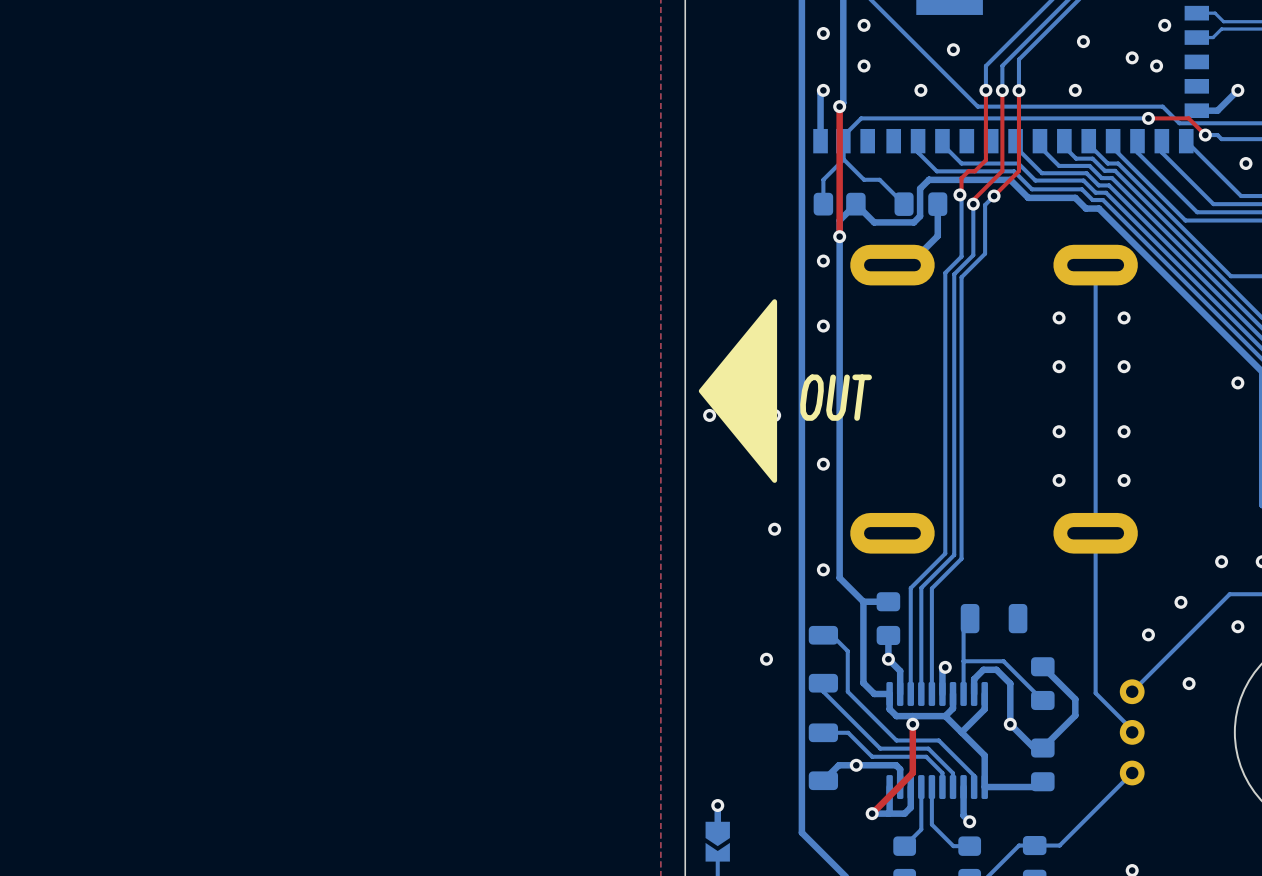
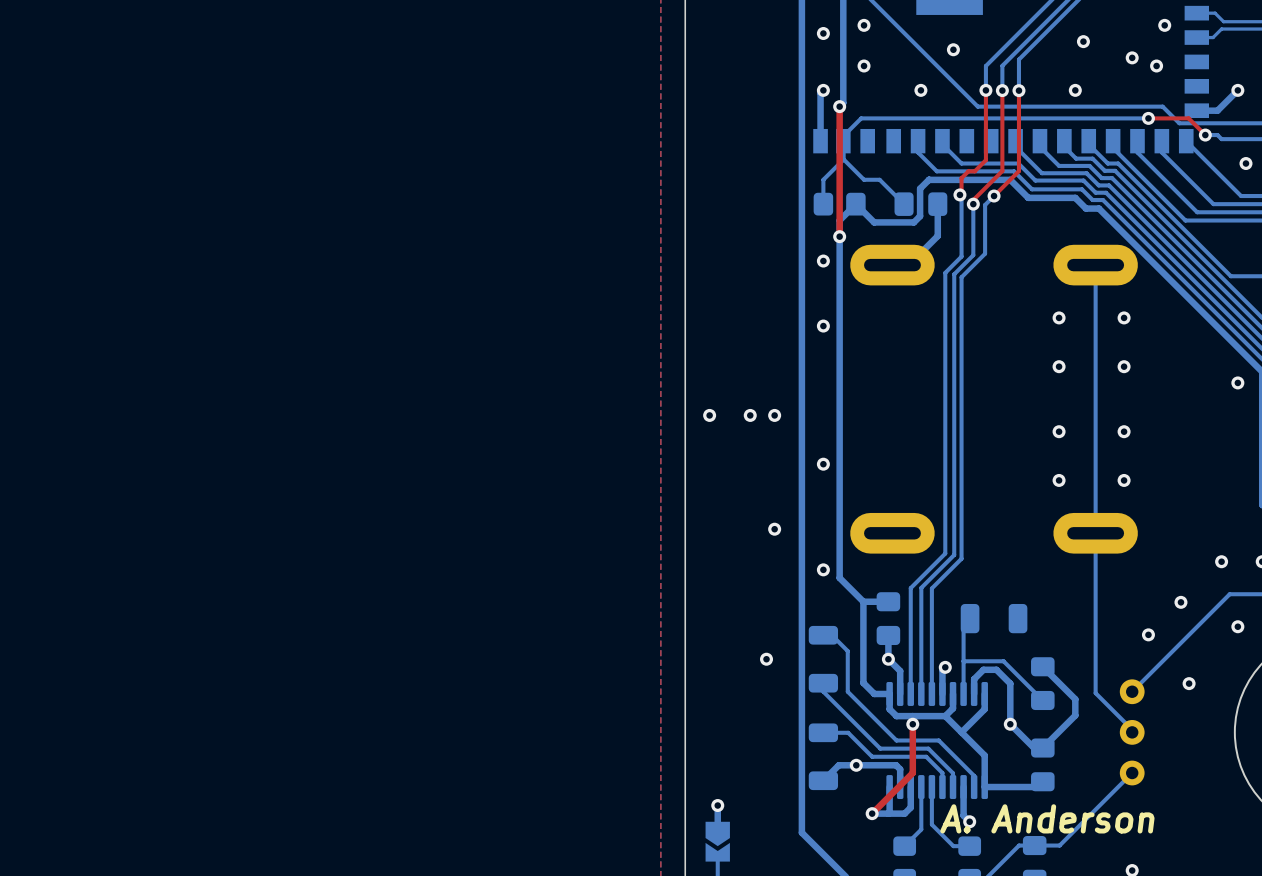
drawing: [698, 299, 778, 483] -> none
text: OUT (836, 397) -> none
text: none -> A. Anderson (1047, 818)

